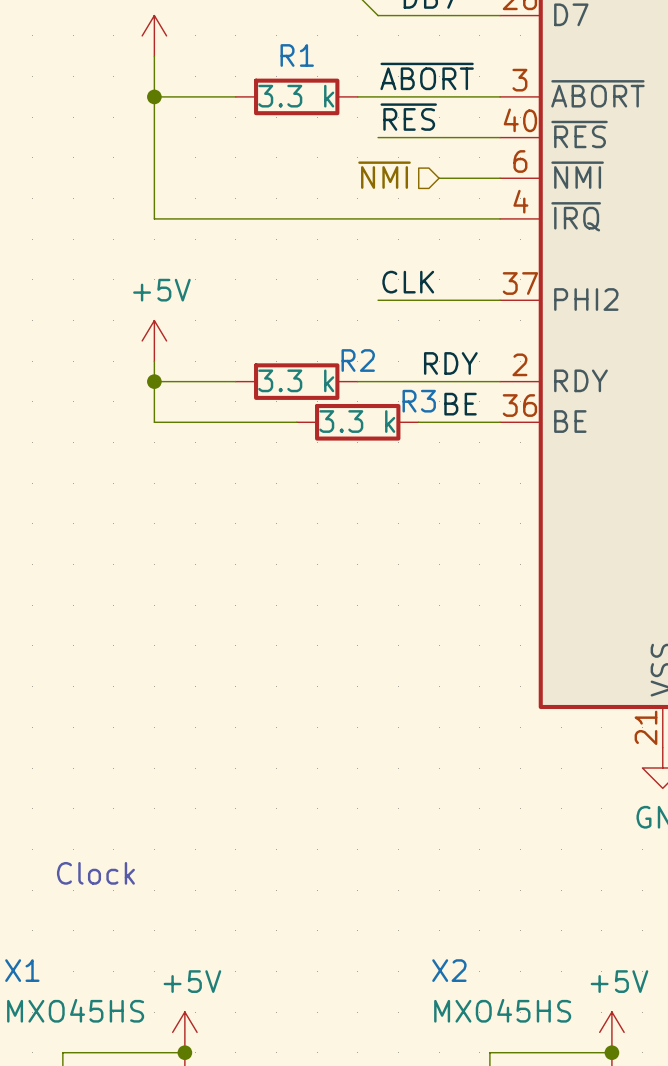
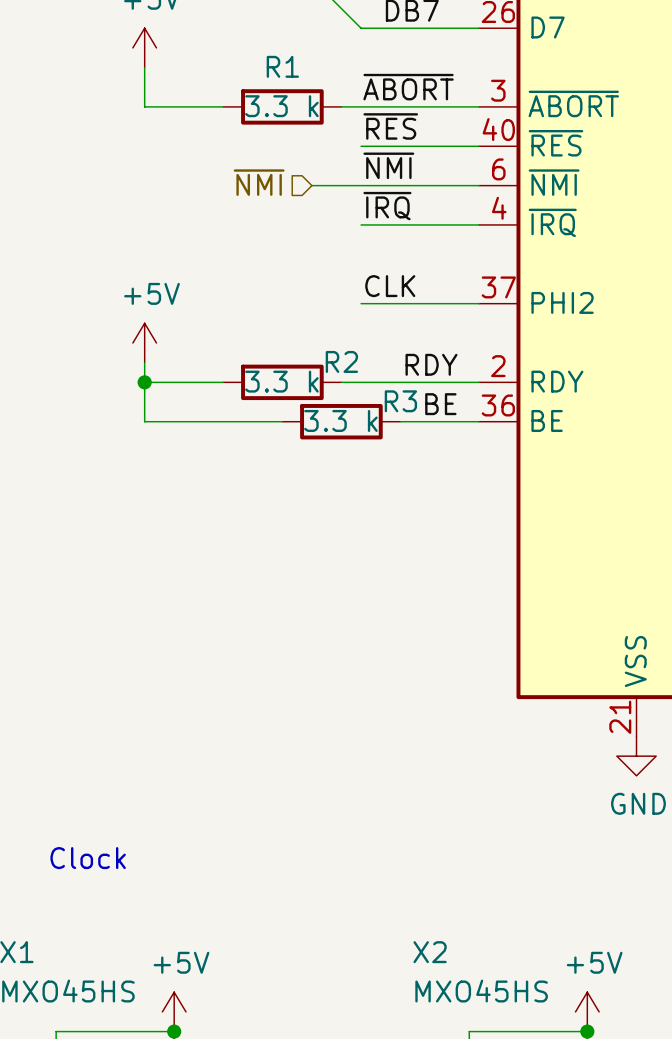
wire: (154, 96) (154, 218) (378, 218) -> none
junction: (154, 96) -> none
label: none -> ~{NMI} (388, 165)
hierarchical label position: ~{NMI} (384, 175) -> ~{NMI} (259, 182)
wire: none -> (311, 185) (420, 185)
label: none -> ~{IRQ} (387, 206)

